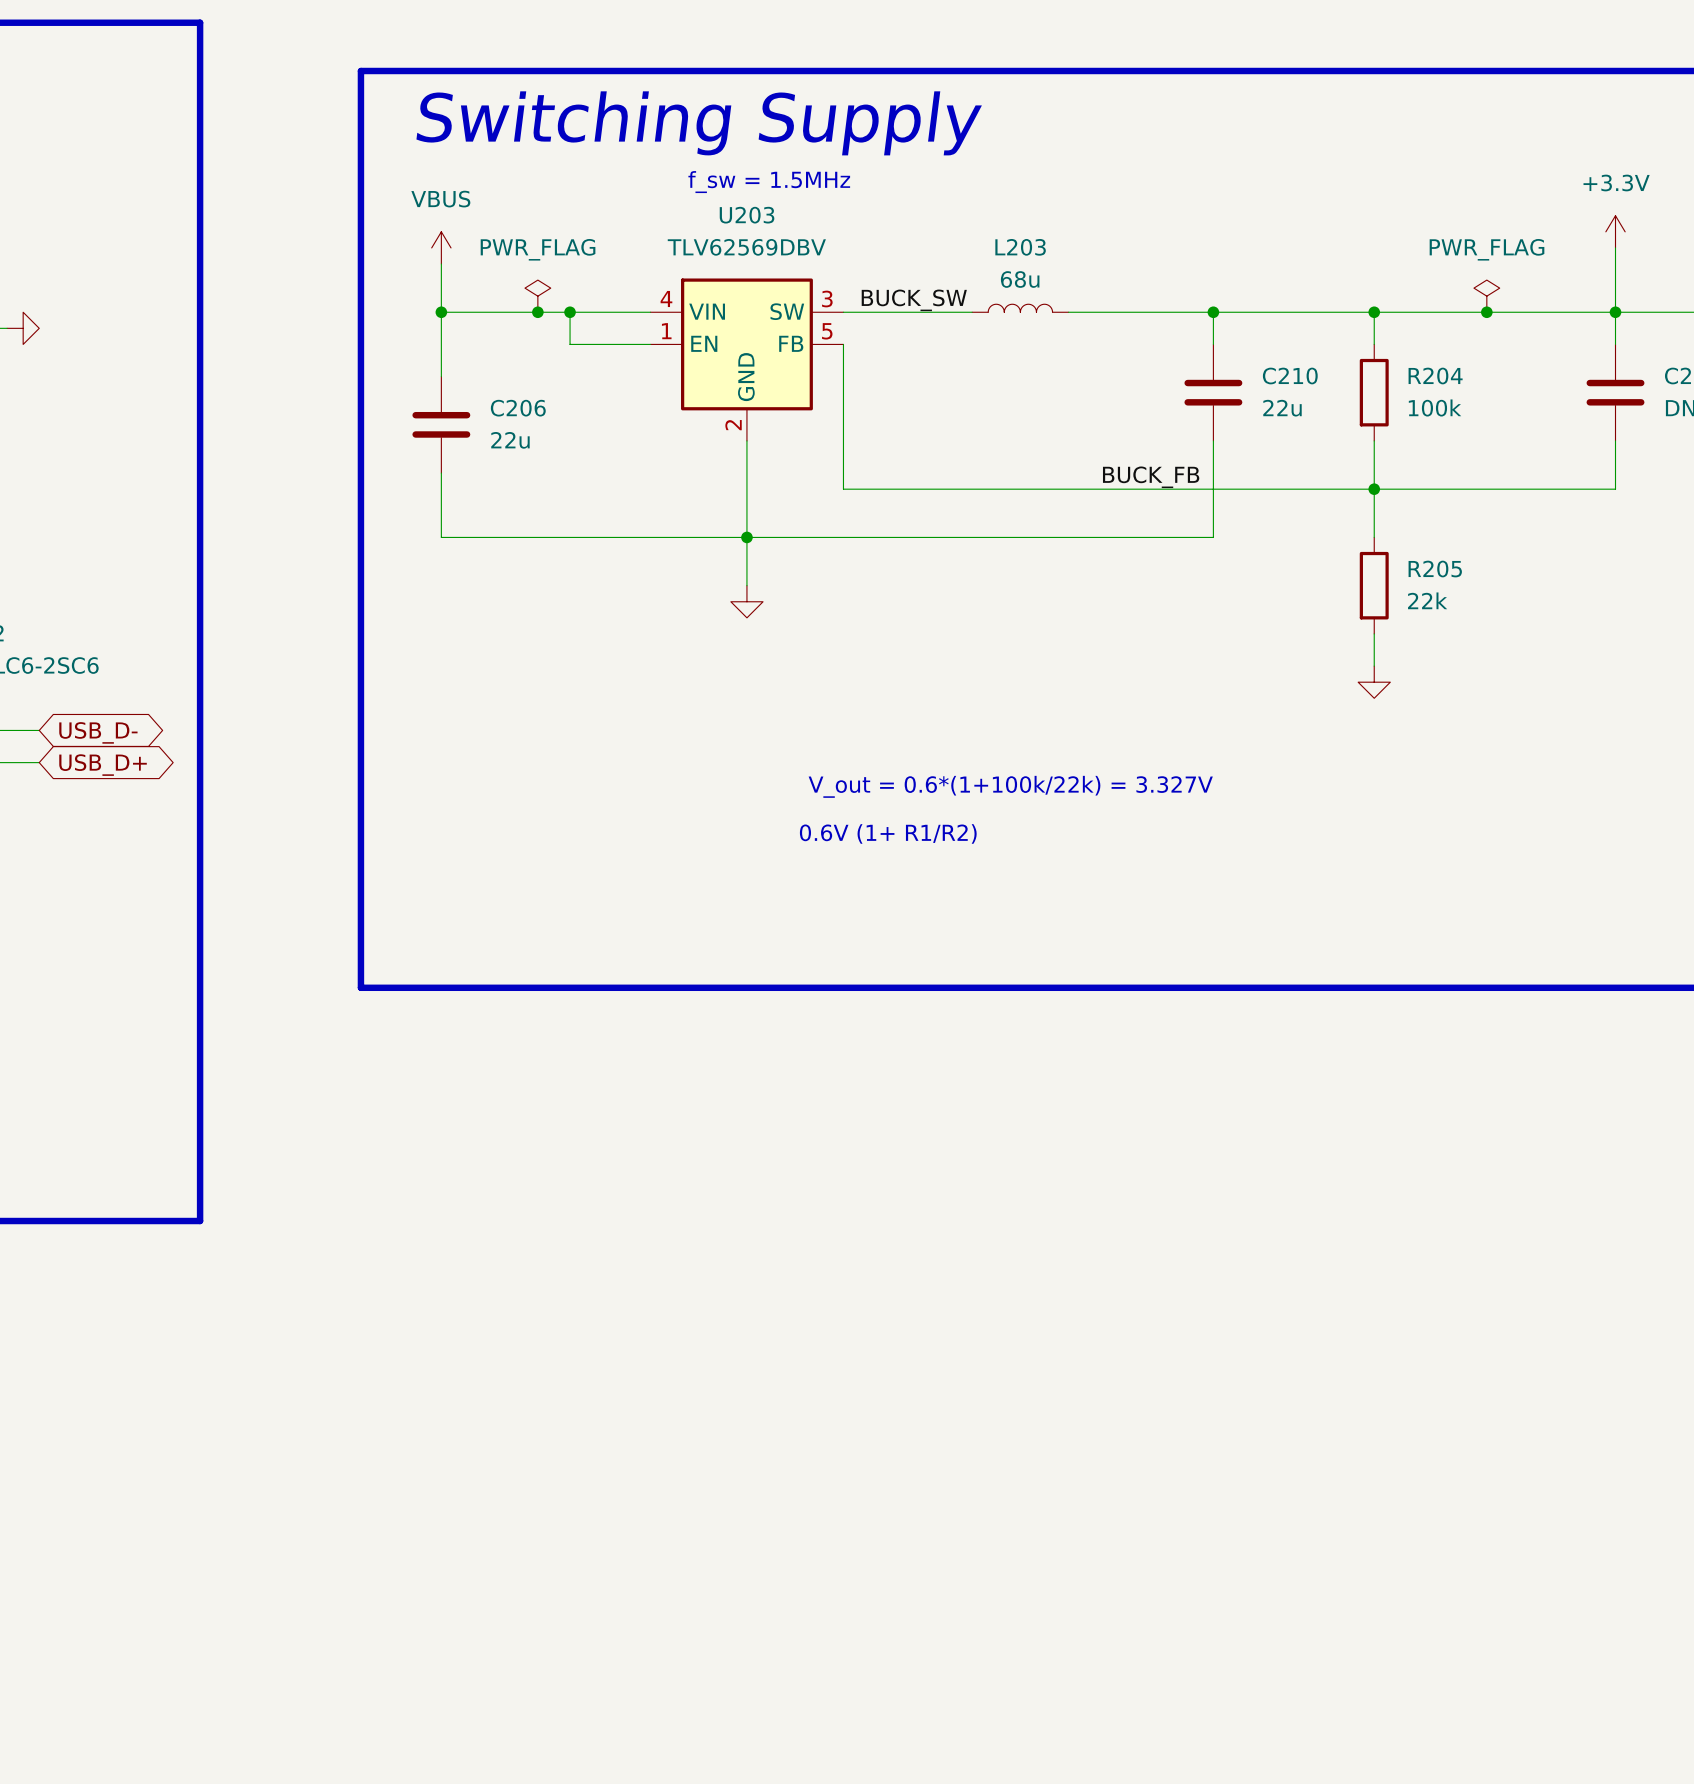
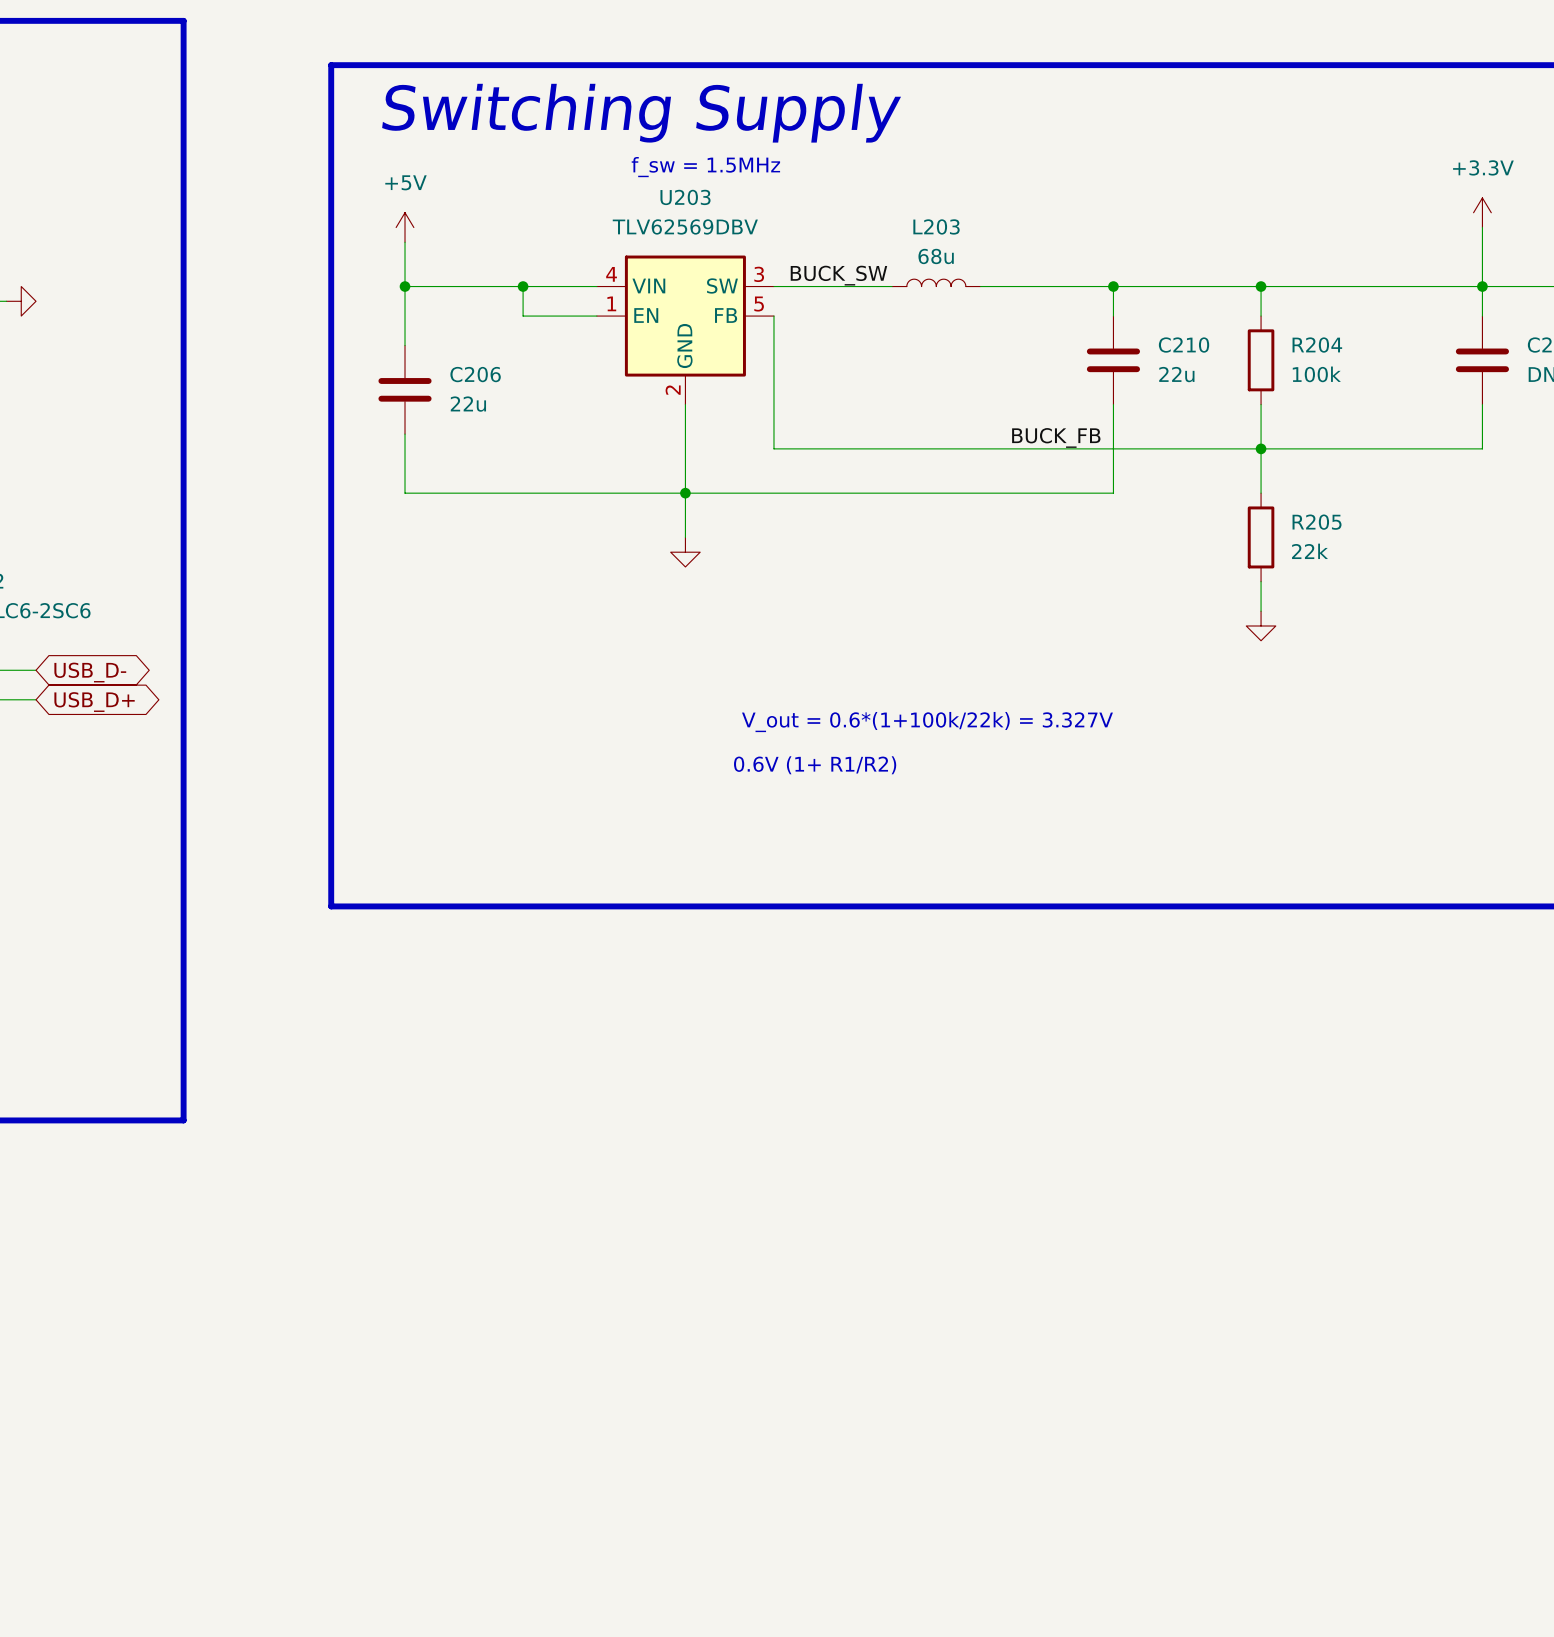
power symbol: VBUS (441, 247) -> +5V (405, 227)
power symbol: PWR_FLAG (537, 296) -> none
power symbol: PWR_FLAG (1486, 296) -> none
junction: (537, 312) -> none
junction: (1486, 312) -> none

